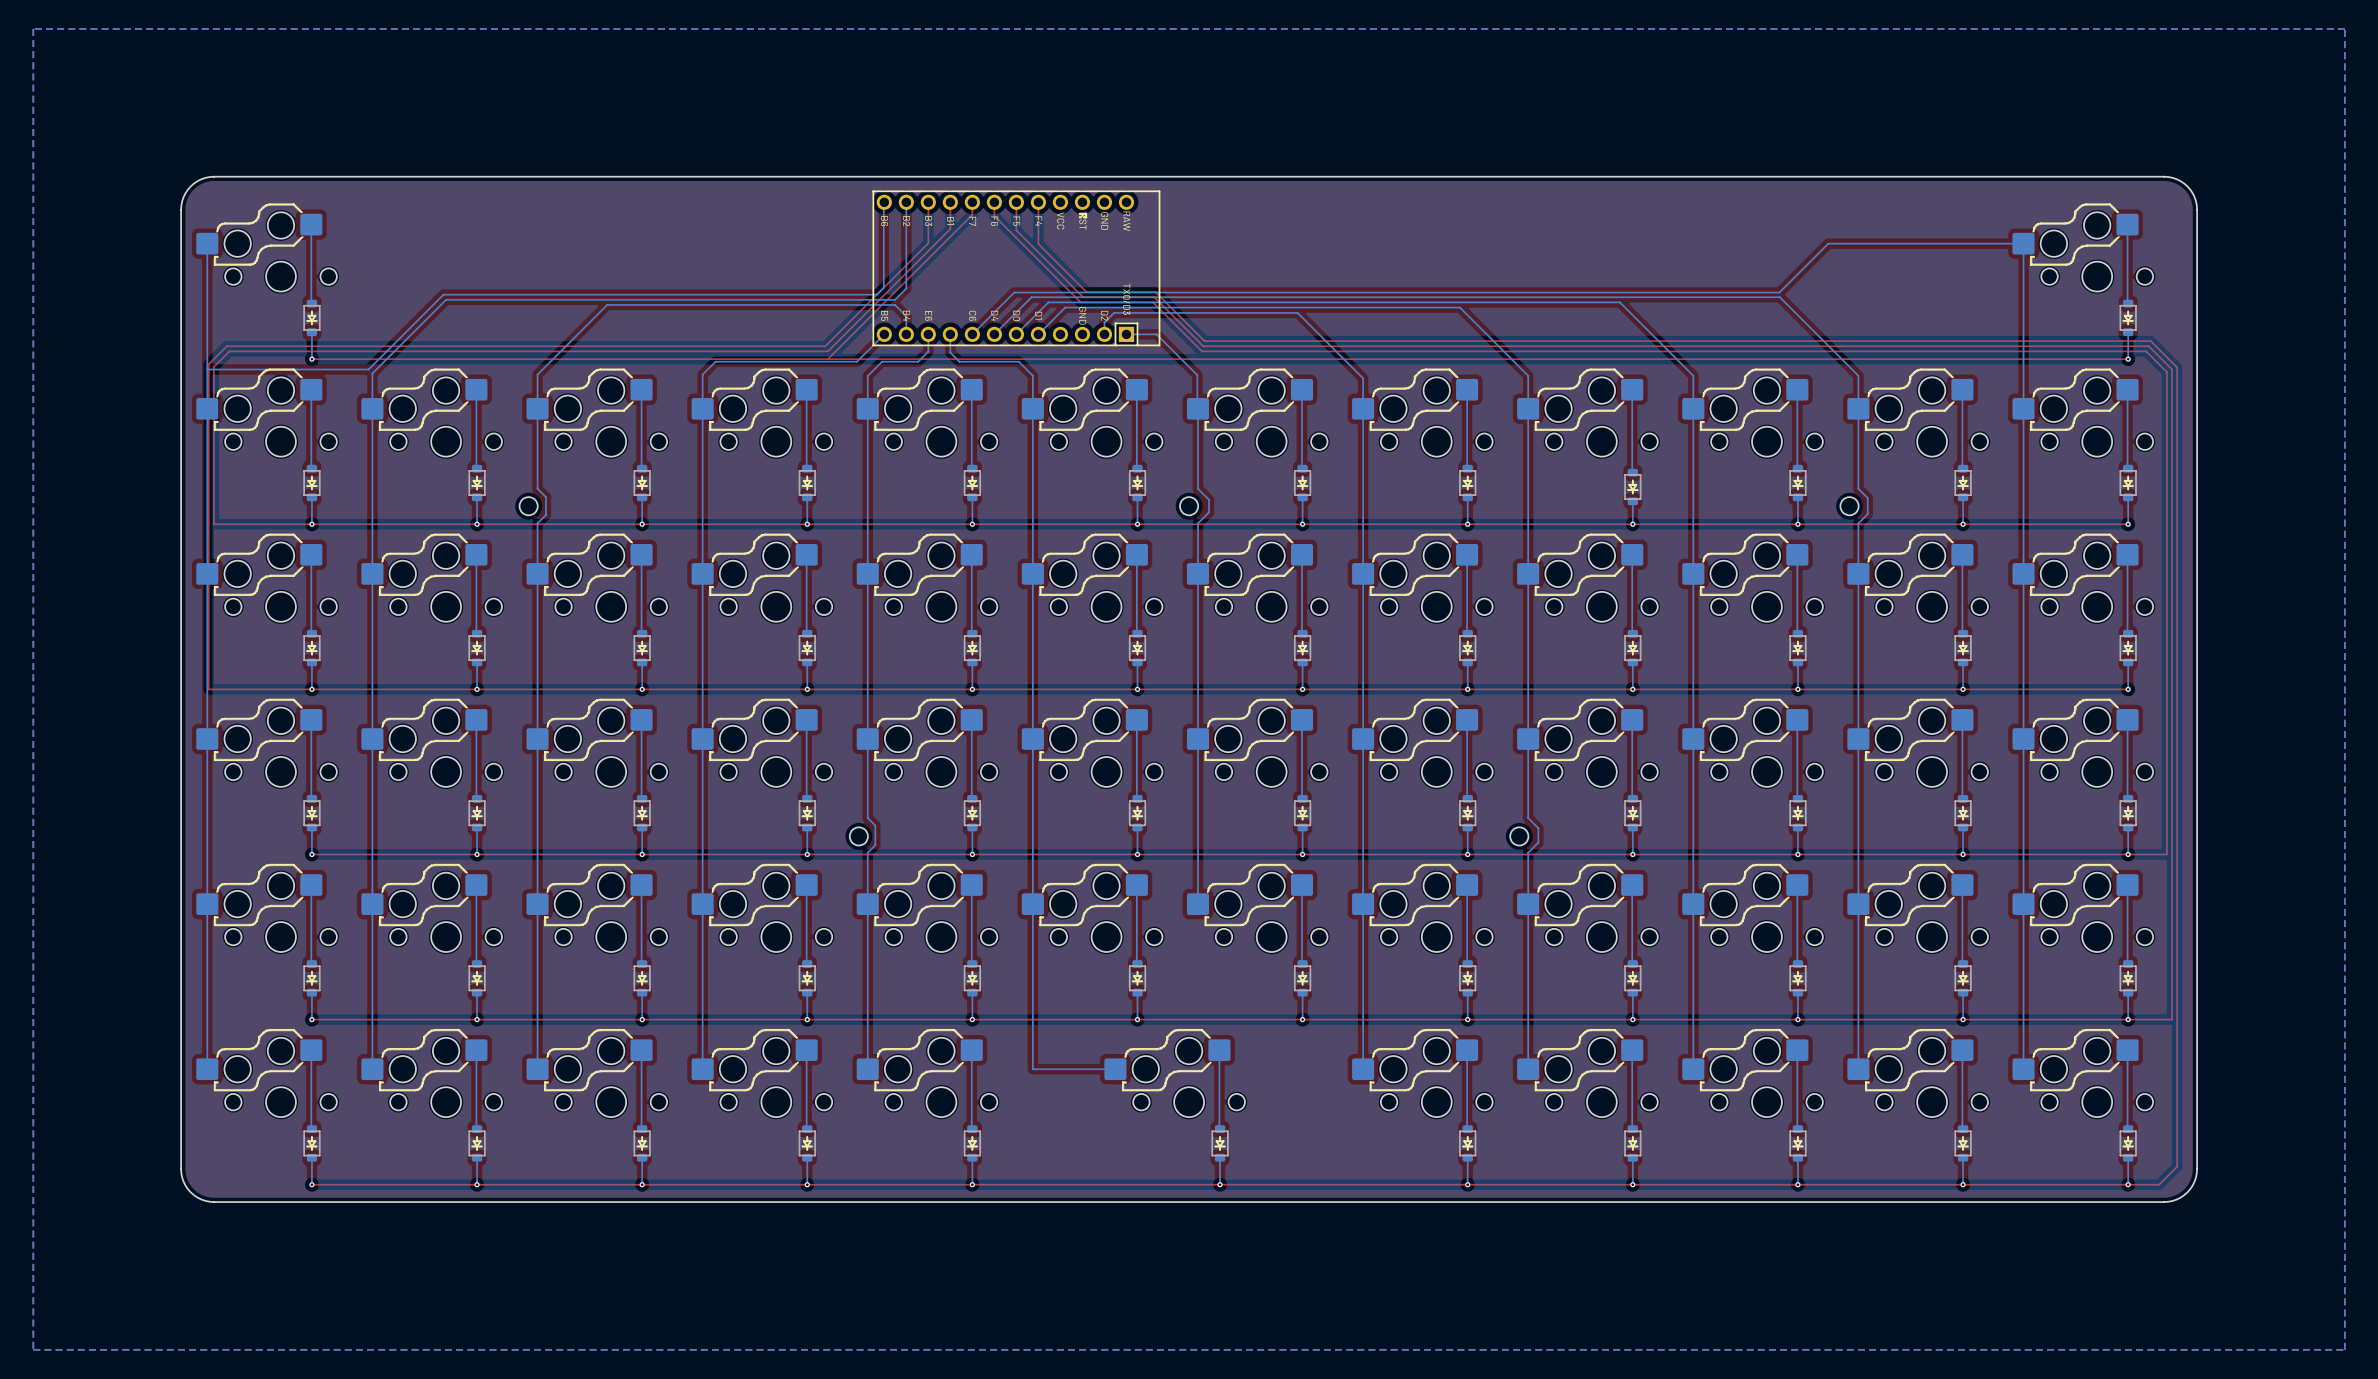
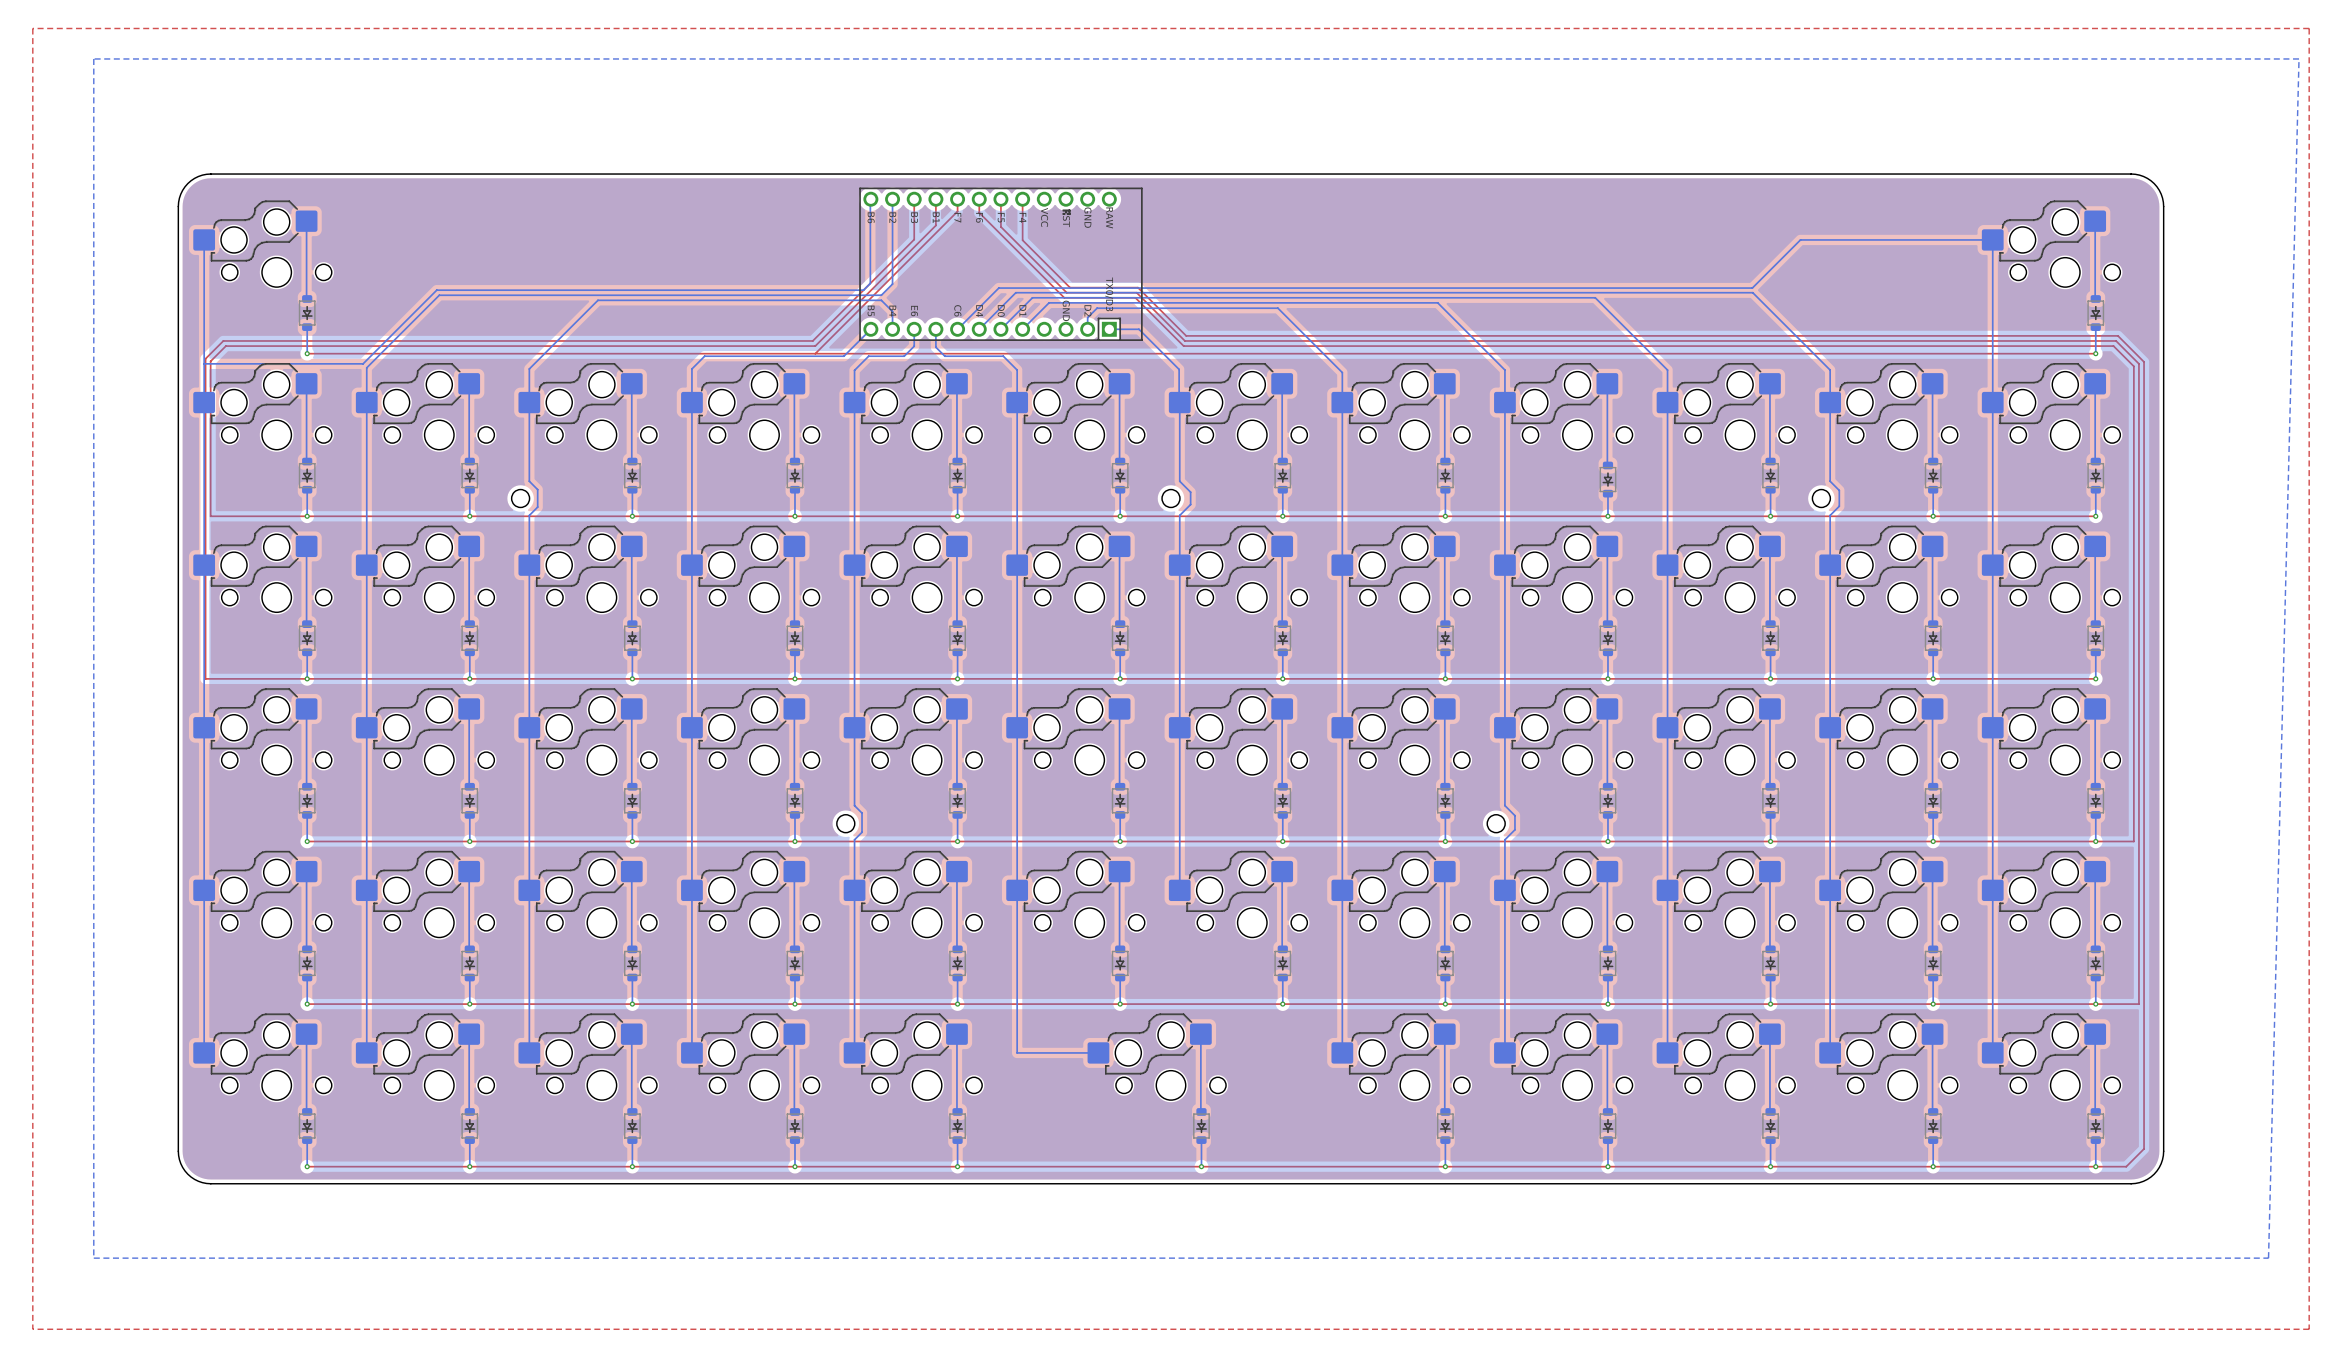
bottom zone outline: (2344, 28) (33, 28) (33, 1349) (2344, 1349) (2344, 28) -> (2299, 58) (2268, 1258) (93, 1258) (93, 58) (2299, 58)

